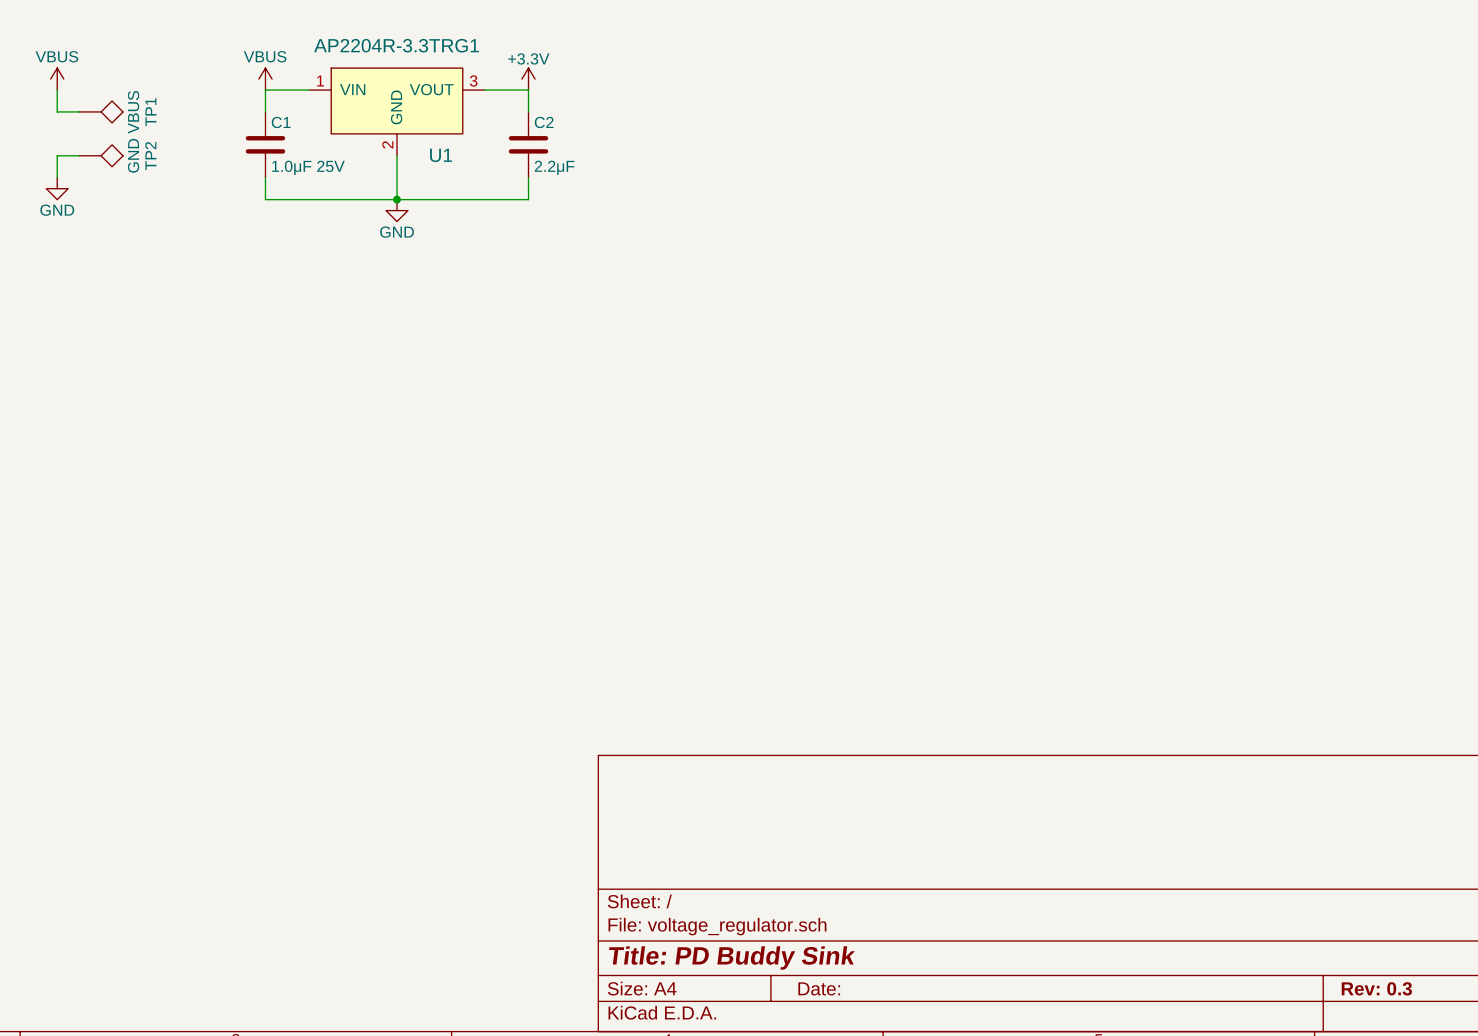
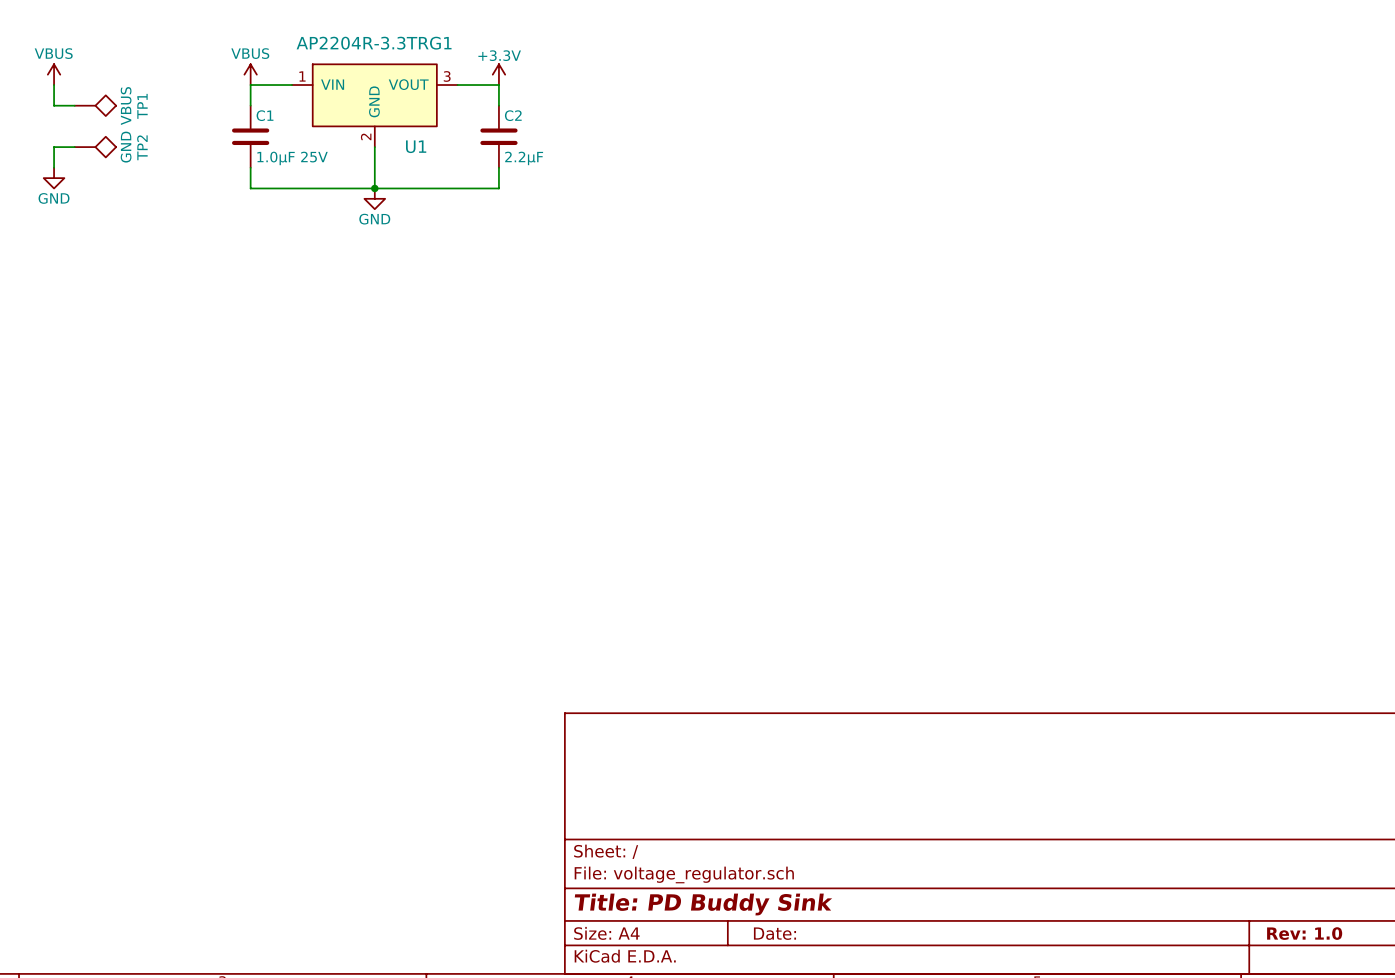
title block: Rev: 0.3 (1376, 988) -> Rev: 1.0 (1304, 933)

